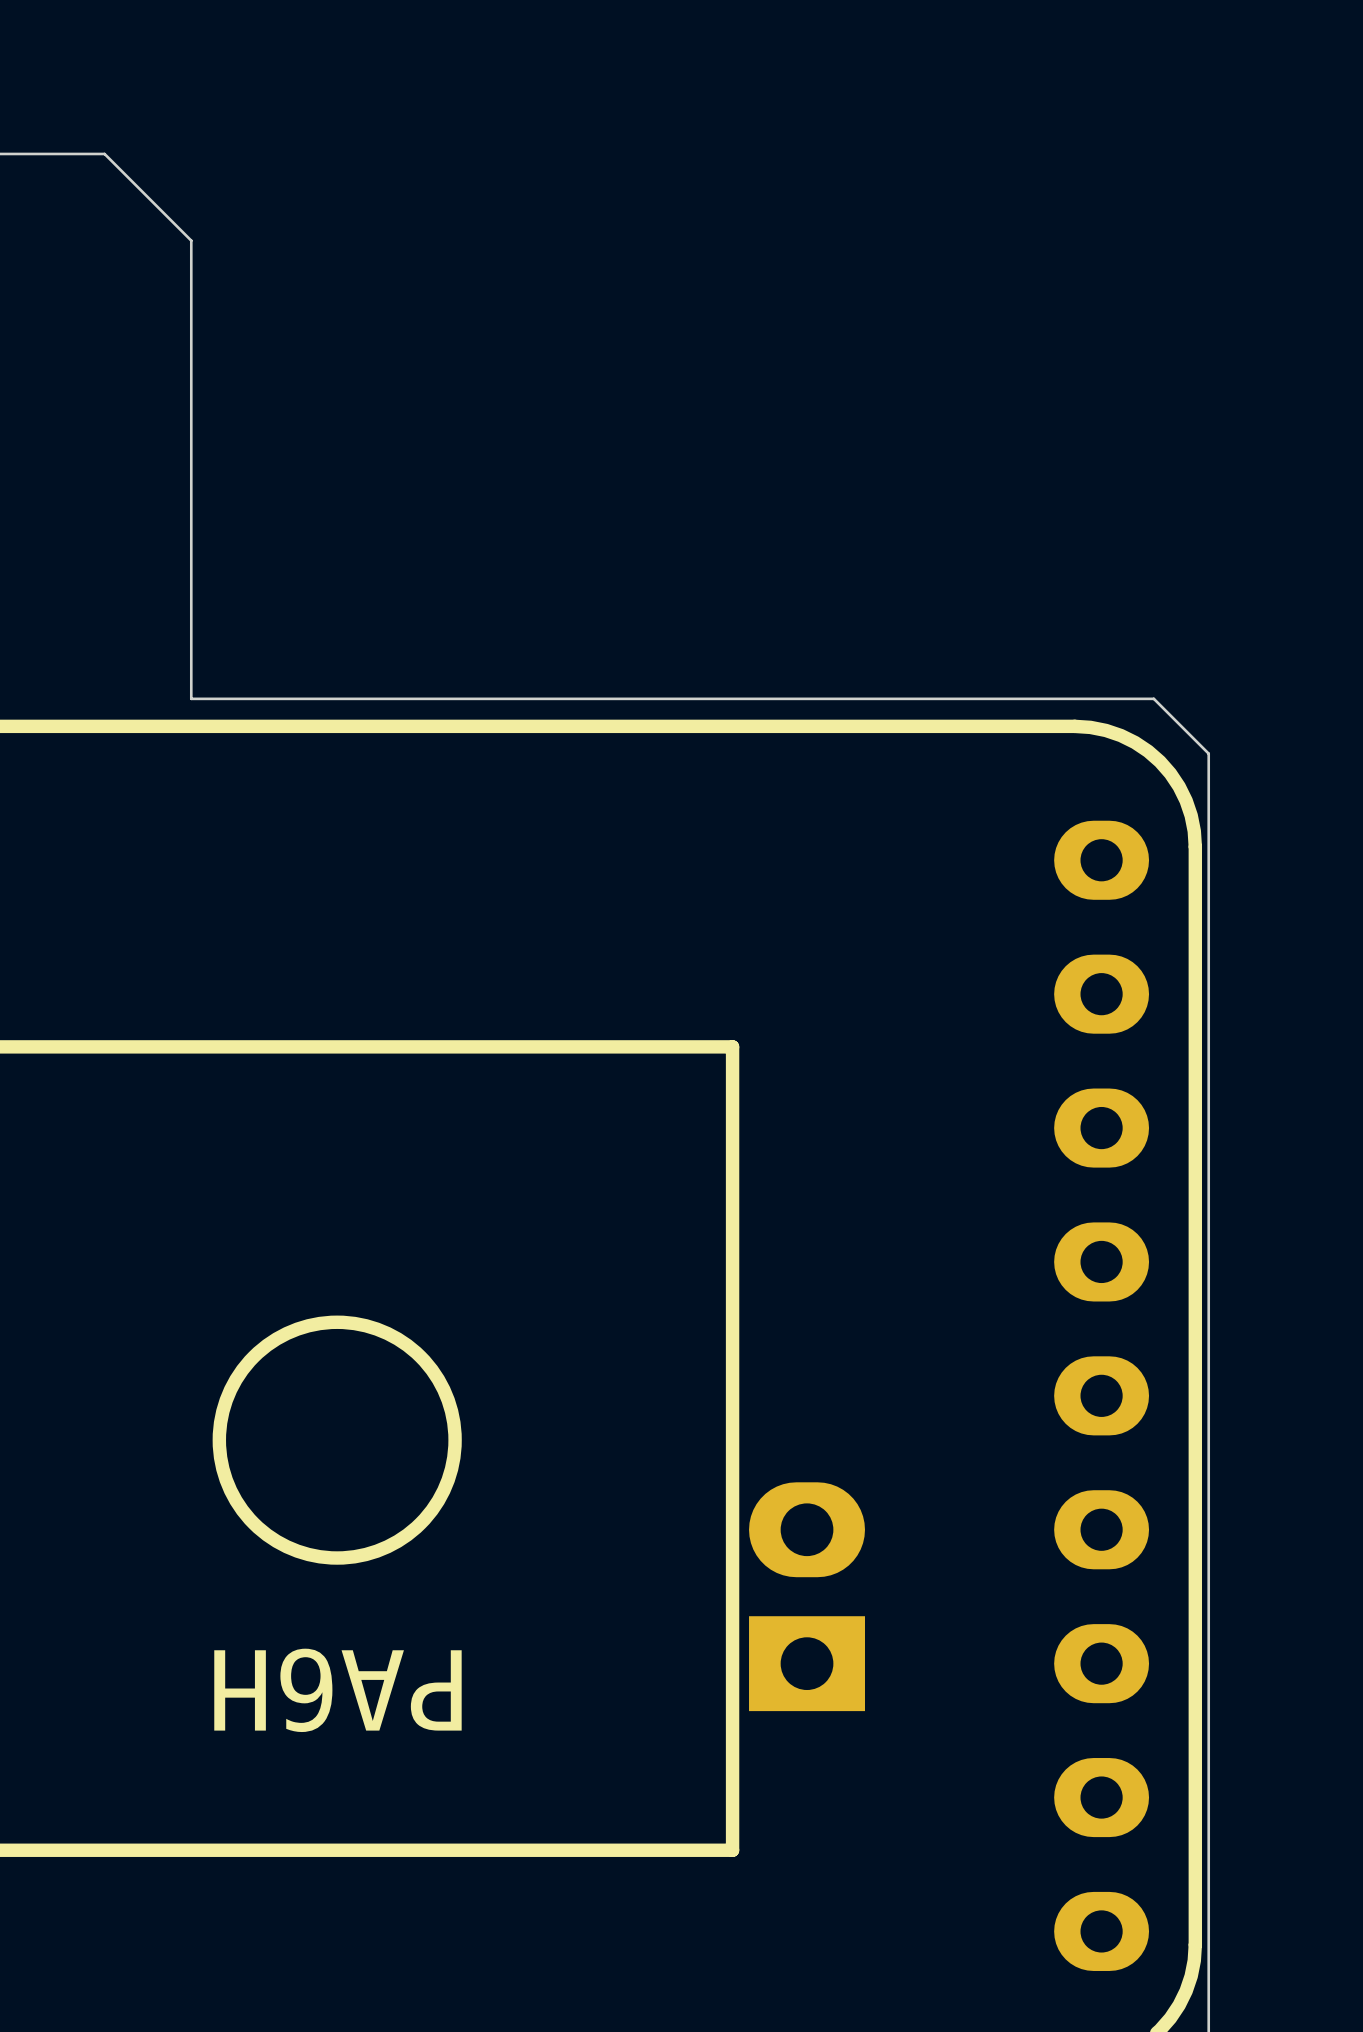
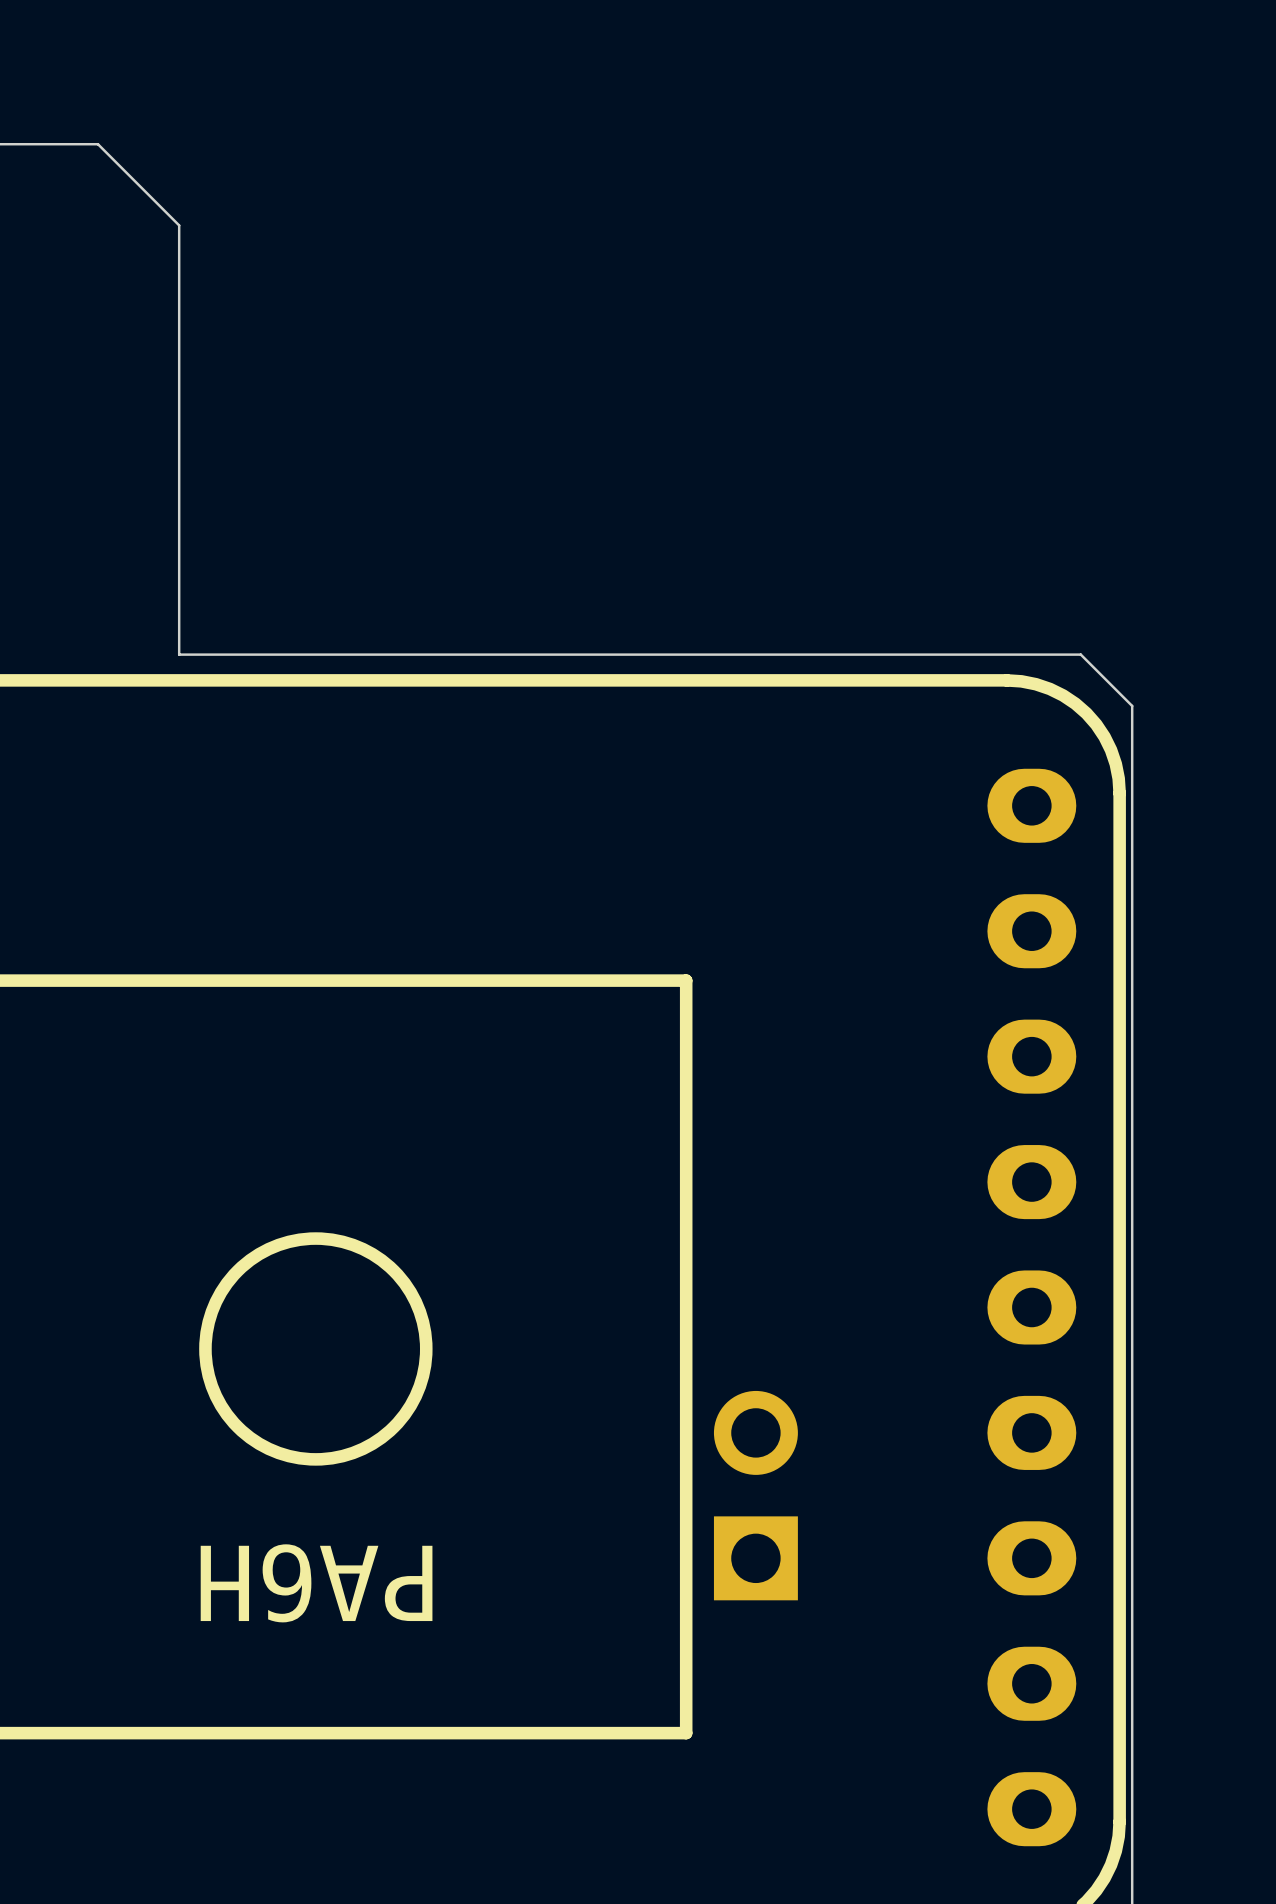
part footprint: [749, 1482, 866, 1712] -> [713, 1390, 798, 1601]

